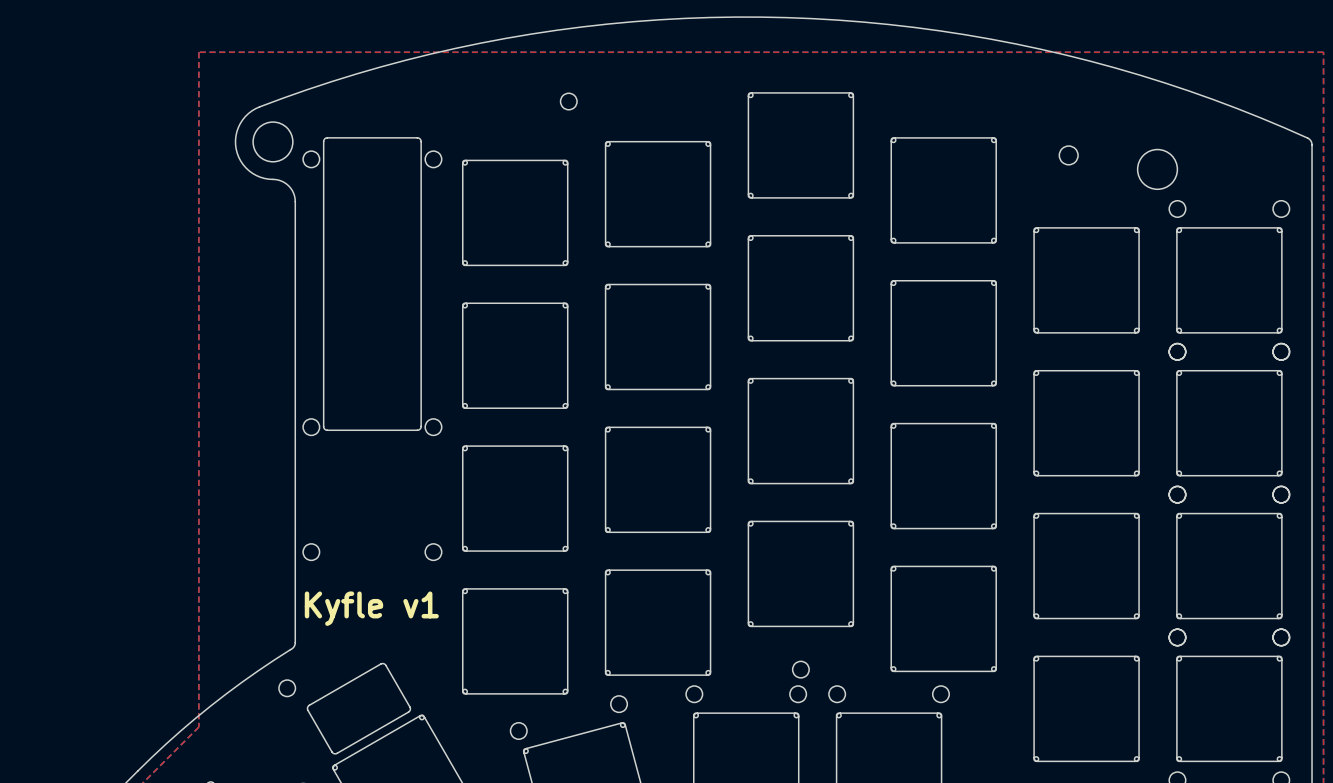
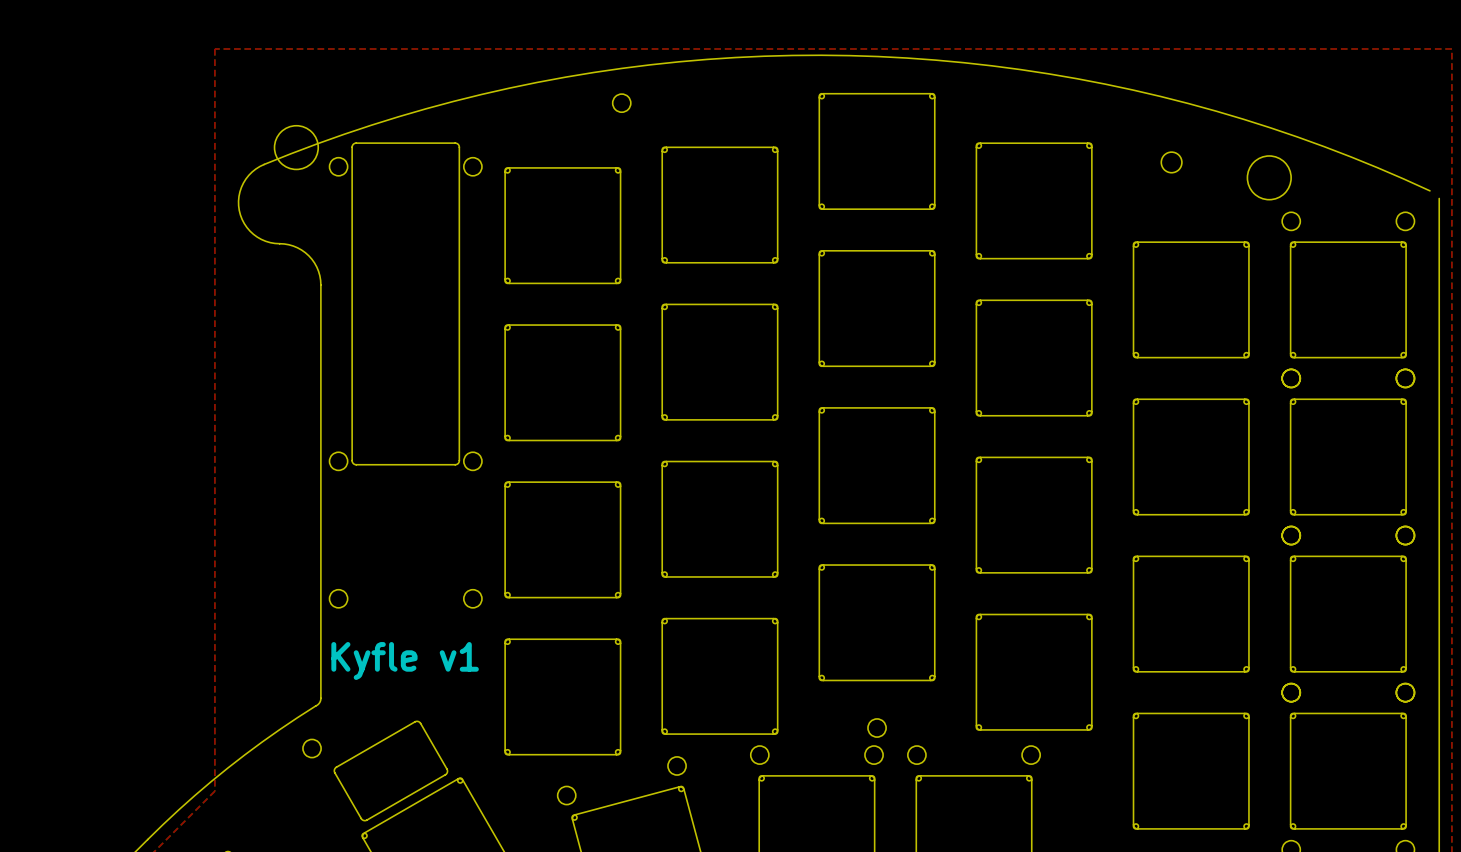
board edge: (1312, 188) (1312, 144) (1309, 139) (1212, 99) (1139, 75) (1040, 49) (939, 30) (863, 22) (786, 17) (709, 17) (633, 21) (556, 30) (480, 43) (405, 60) (332, 81) (259, 106) (245, 116) (238, 127) (235, 144) (238, 157) (245, 167) (256, 175) (278, 180) (286, 184) (292, 190) (295, 198) (295, 642) -> (1429, 190) (1351, 157) (1297, 137) (1216, 111) (1132, 90) (1048, 73) (992, 65) (906, 58) (849, 55) (764, 56) (707, 59) (621, 68) (565, 77) (509, 88) (426, 108) (344, 134) (264, 164) (252, 171) (241, 187) (238, 201) (242, 219) (250, 231) (261, 239) (293, 246) (305, 252) (314, 263) (320, 280) (320, 698)

